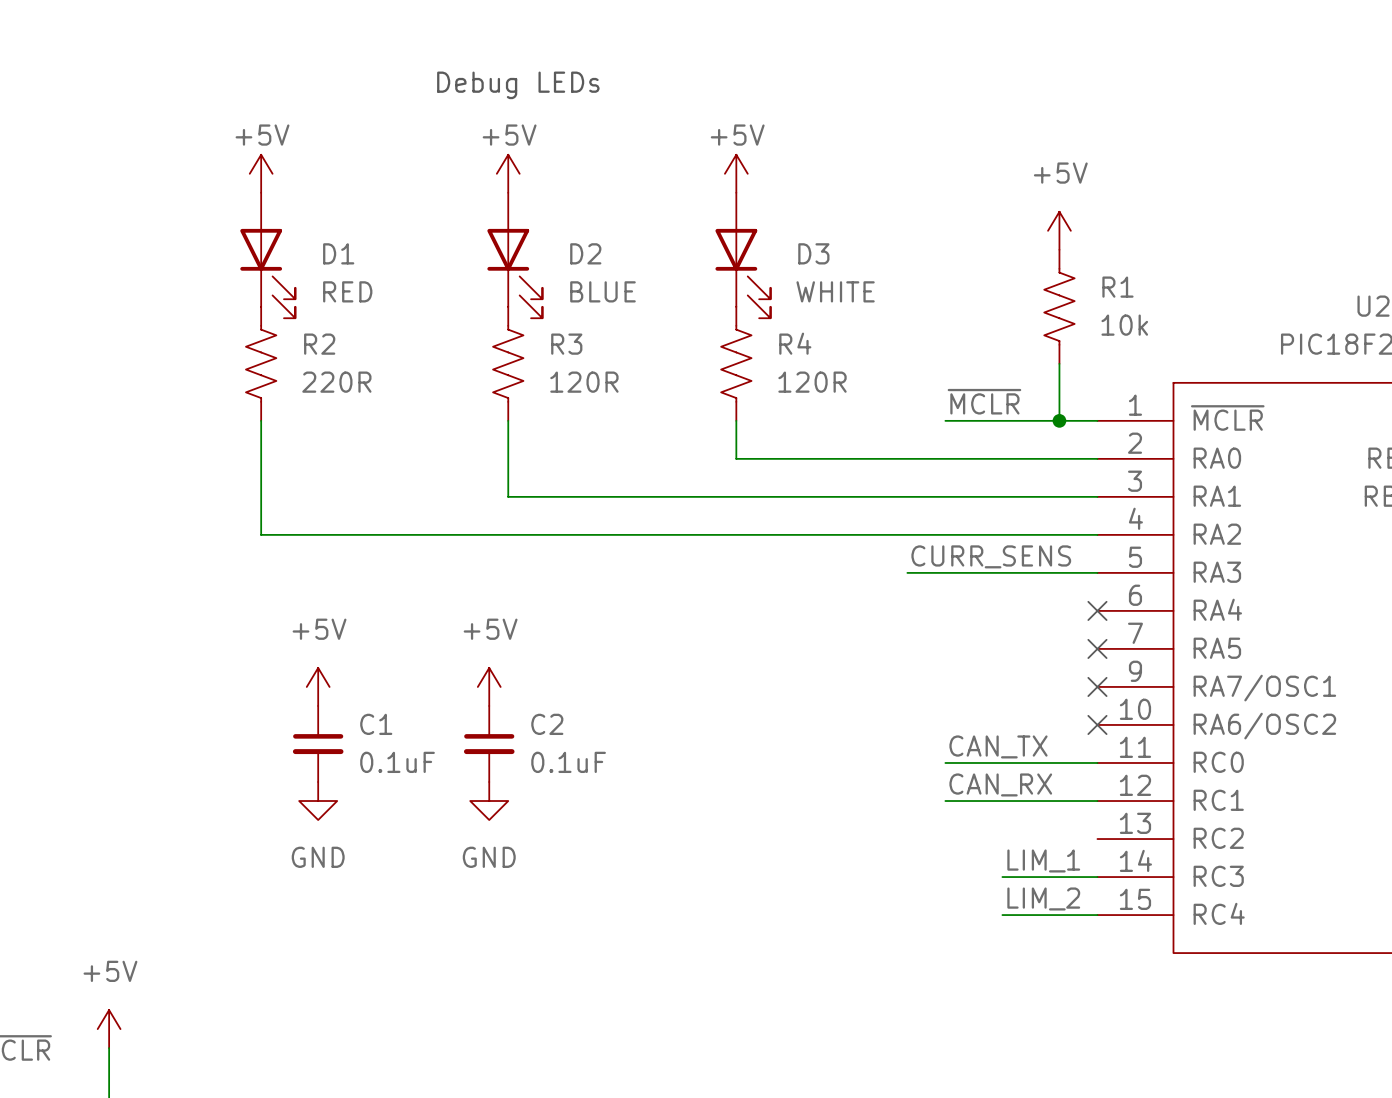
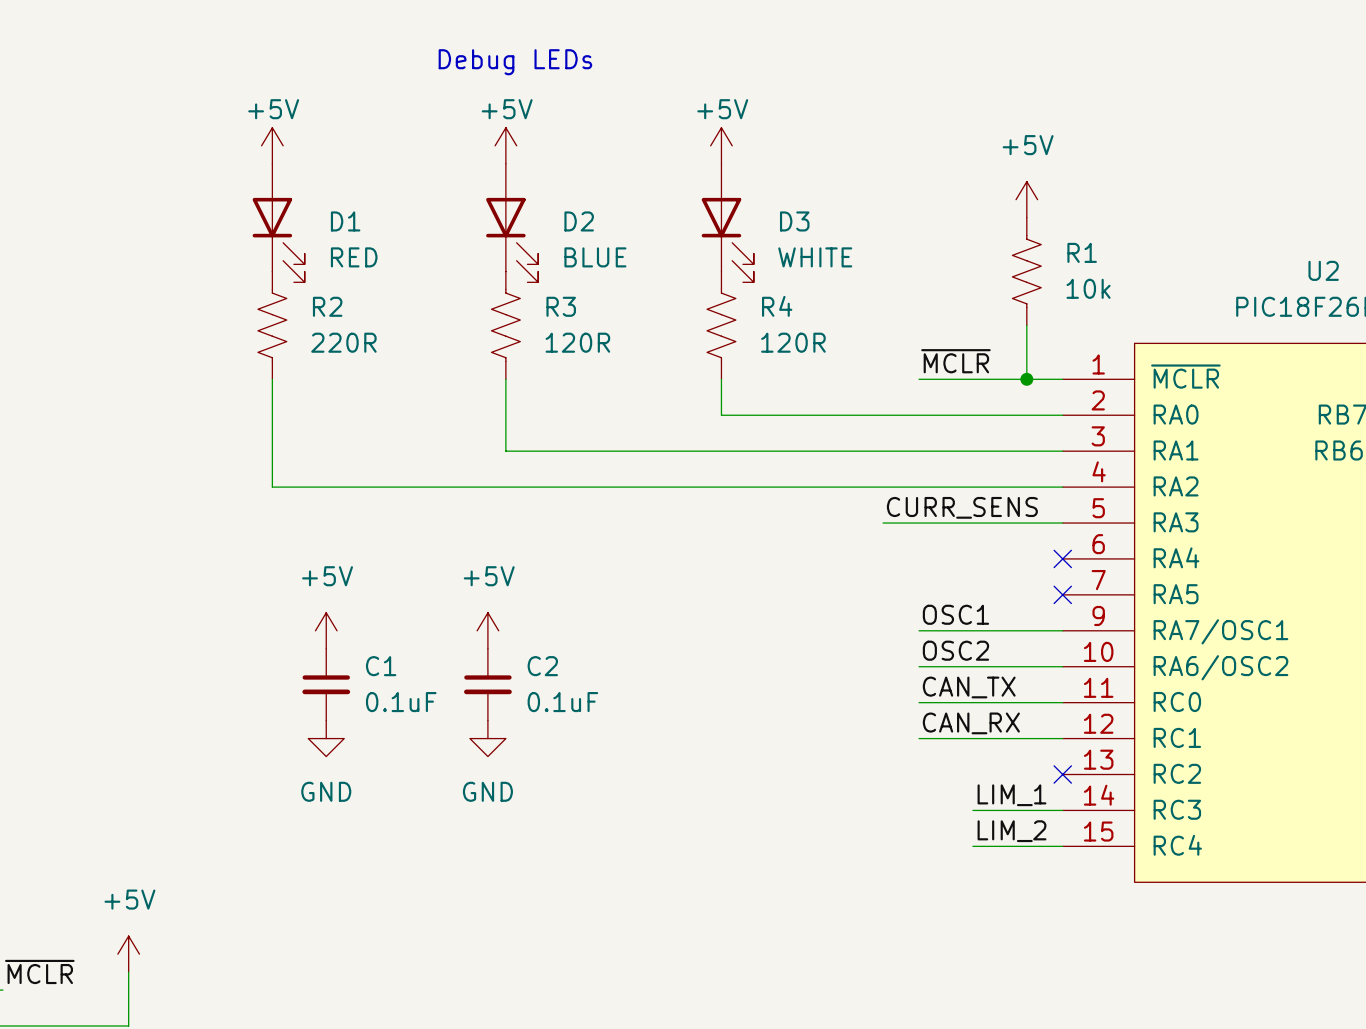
label: none -> OSC1 (955, 614)
wire: none -> (919, 630) (1062, 630)
no-connect mark: (1097, 686) -> none
label: none -> OSC2 (955, 650)
wire: none -> (919, 666) (1062, 666)
no-connect mark: (1097, 724) -> none
no-connect mark: none -> (1062, 774)

